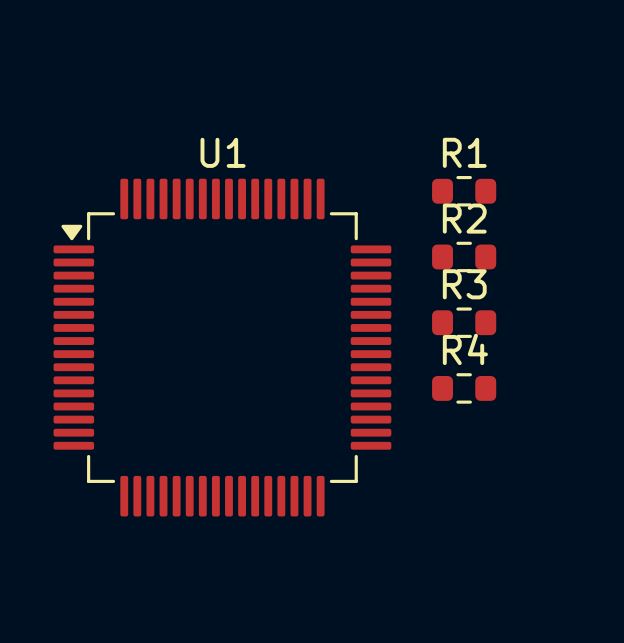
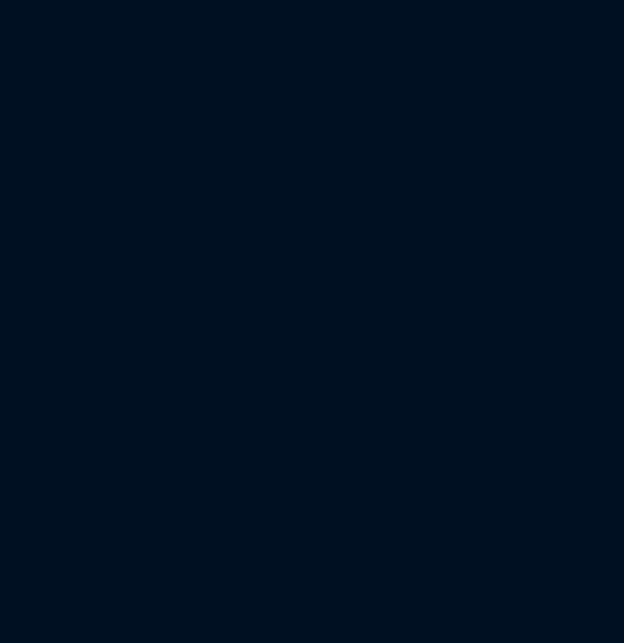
R1: (464, 191) -> none
R2: (464, 256) -> none
R3: (464, 322) -> none
U1: (222, 347) -> none
R4: (464, 388) -> none

